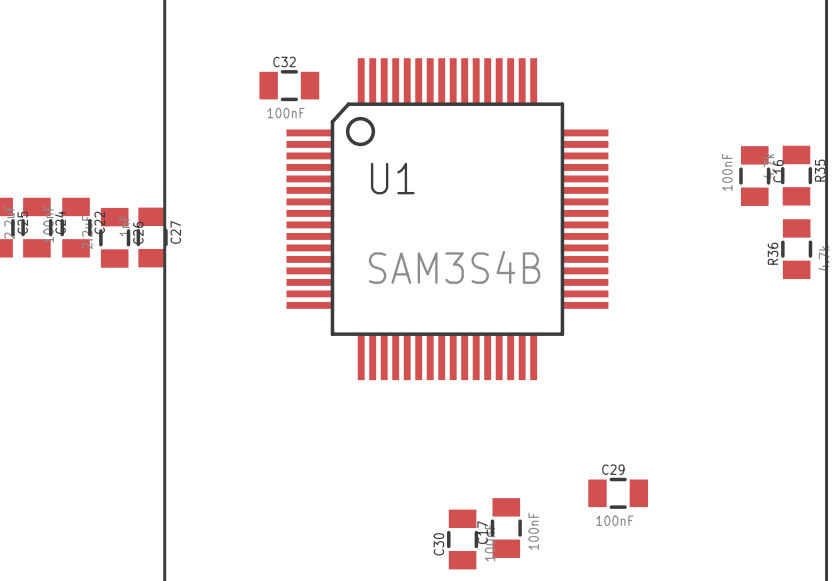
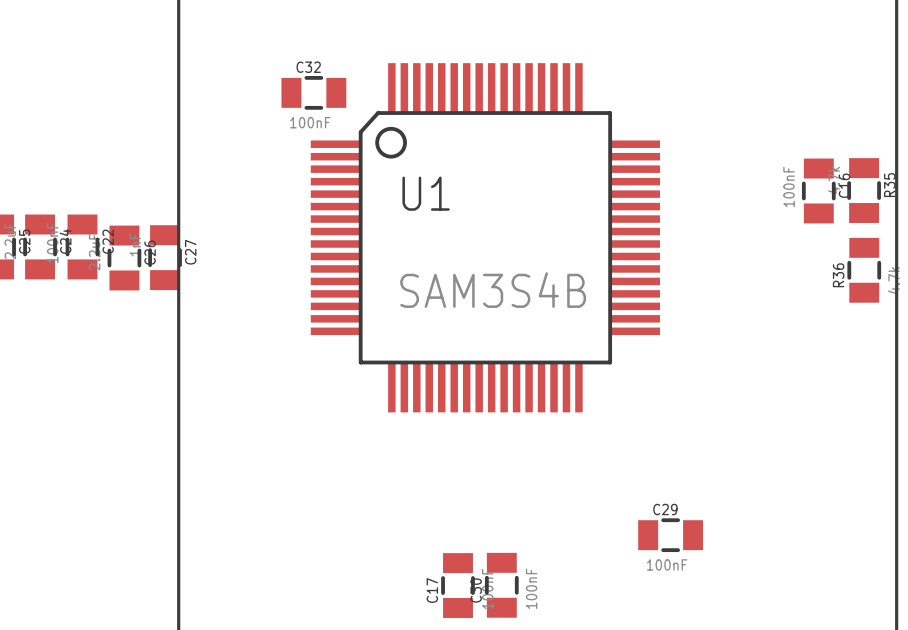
C17 position: (506, 528) -> (457, 585)

